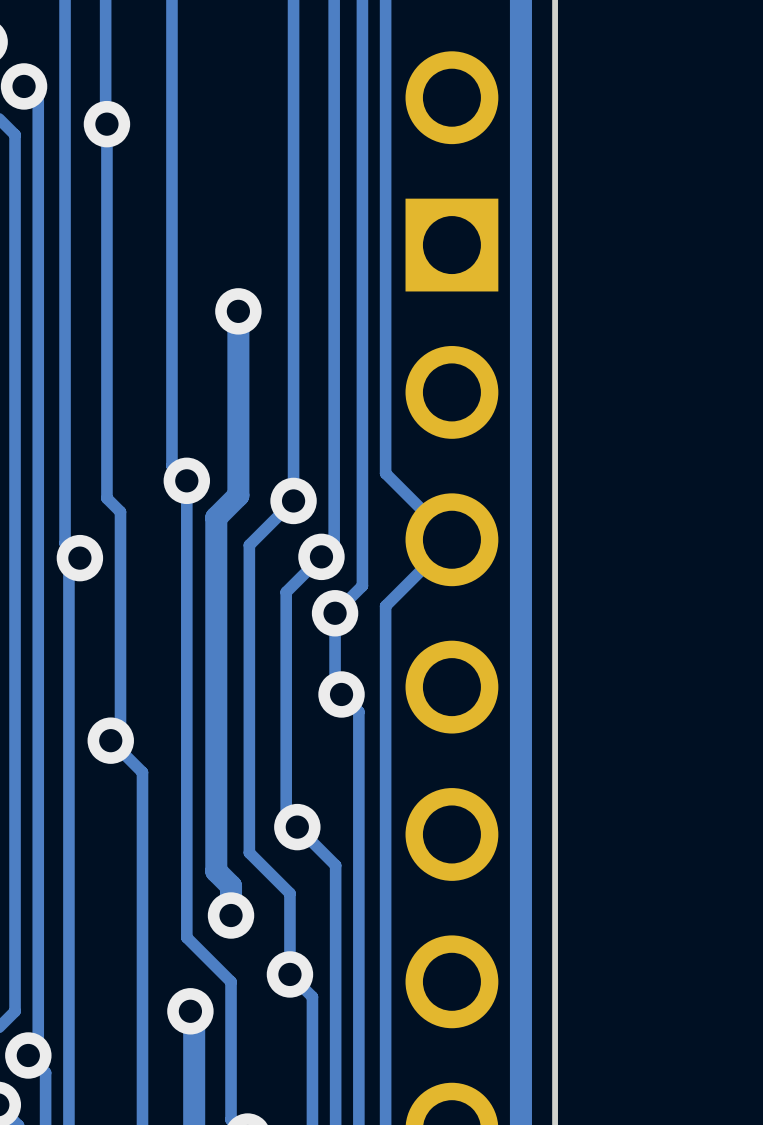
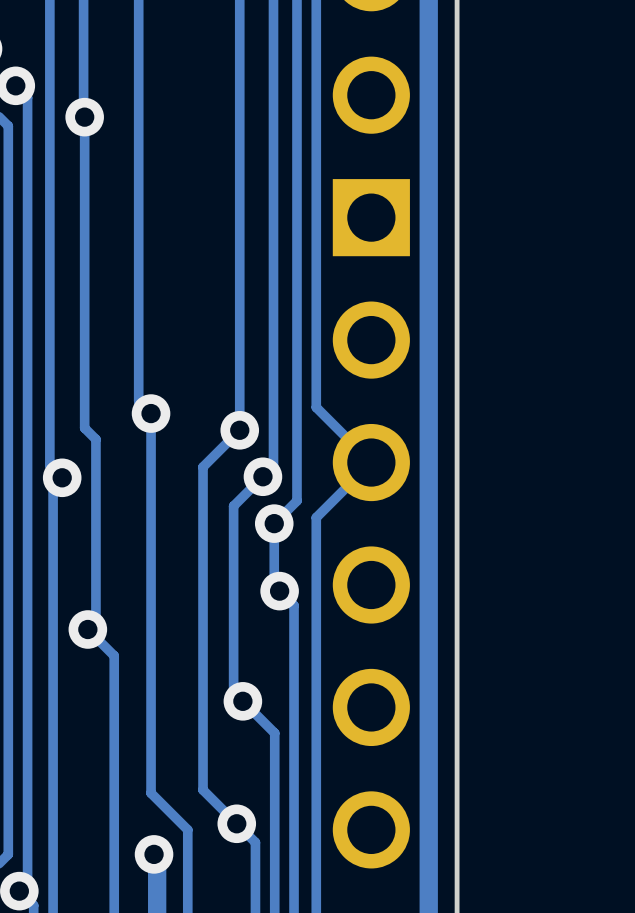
track: (238, 311) (238, 495) (216, 517) (216, 871) (231, 886) (231, 915) -> none
via: (238, 311) -> none
track: (249, 852) (289, 893) (289, 974) -> (203, 722) (203, 790) (236, 823)
via: (231, 915) -> none

